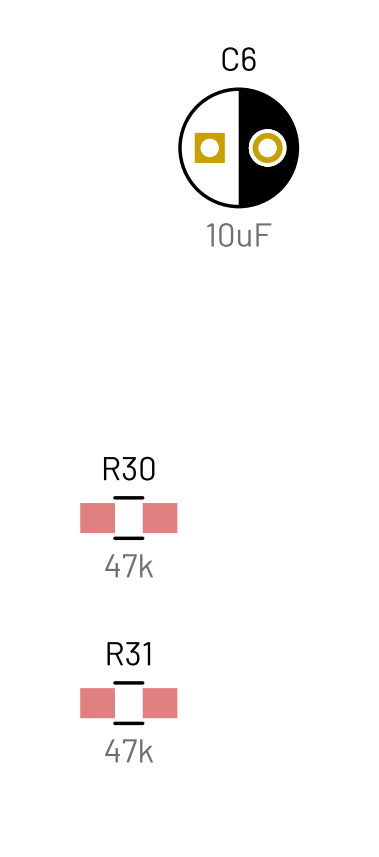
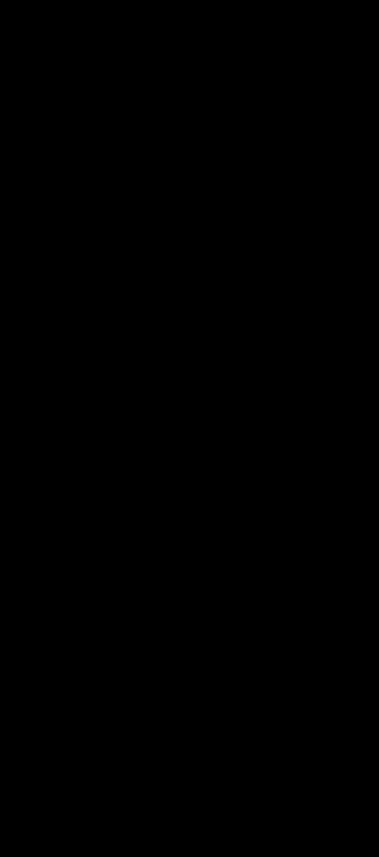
C6: 10uF (238, 147) -> none
R30: 47k (128, 518) -> none
R31: 47k (128, 703) -> none

